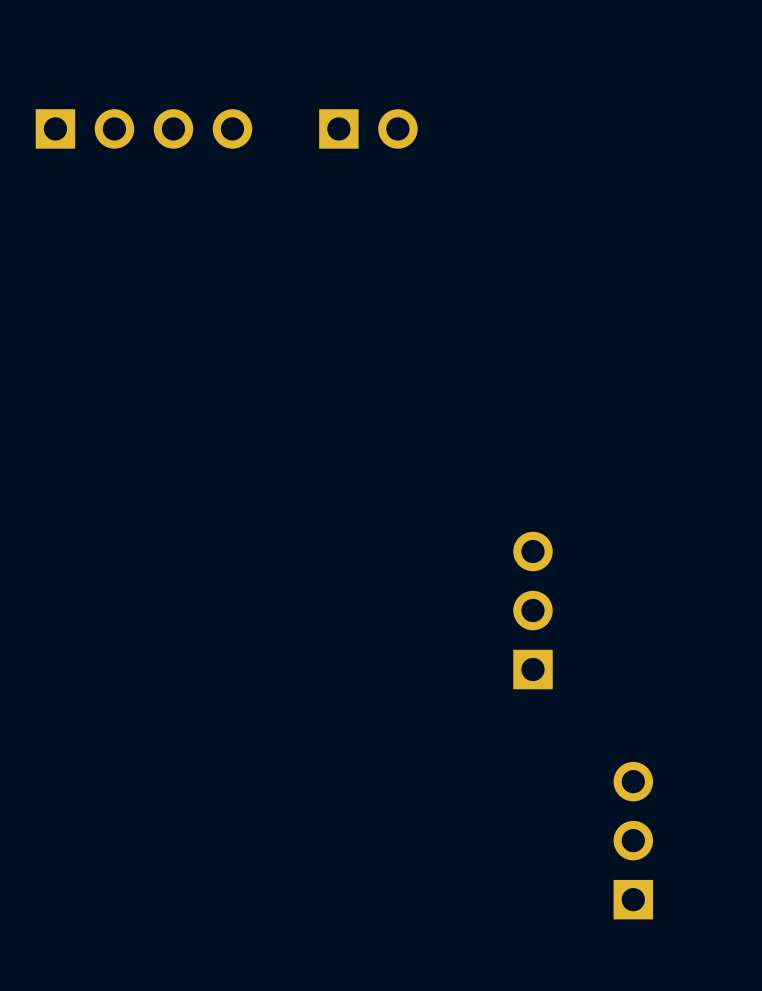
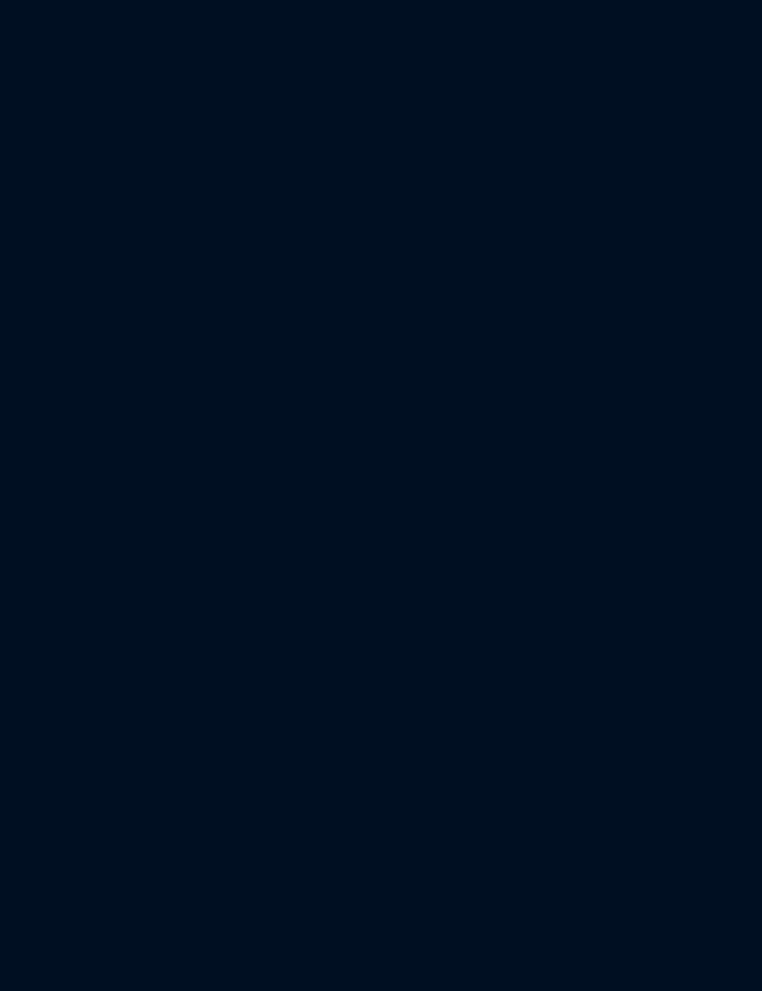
part: (143, 128) -> none
part: (368, 128) -> none
part: (533, 610) -> none
part: (633, 840) -> none

